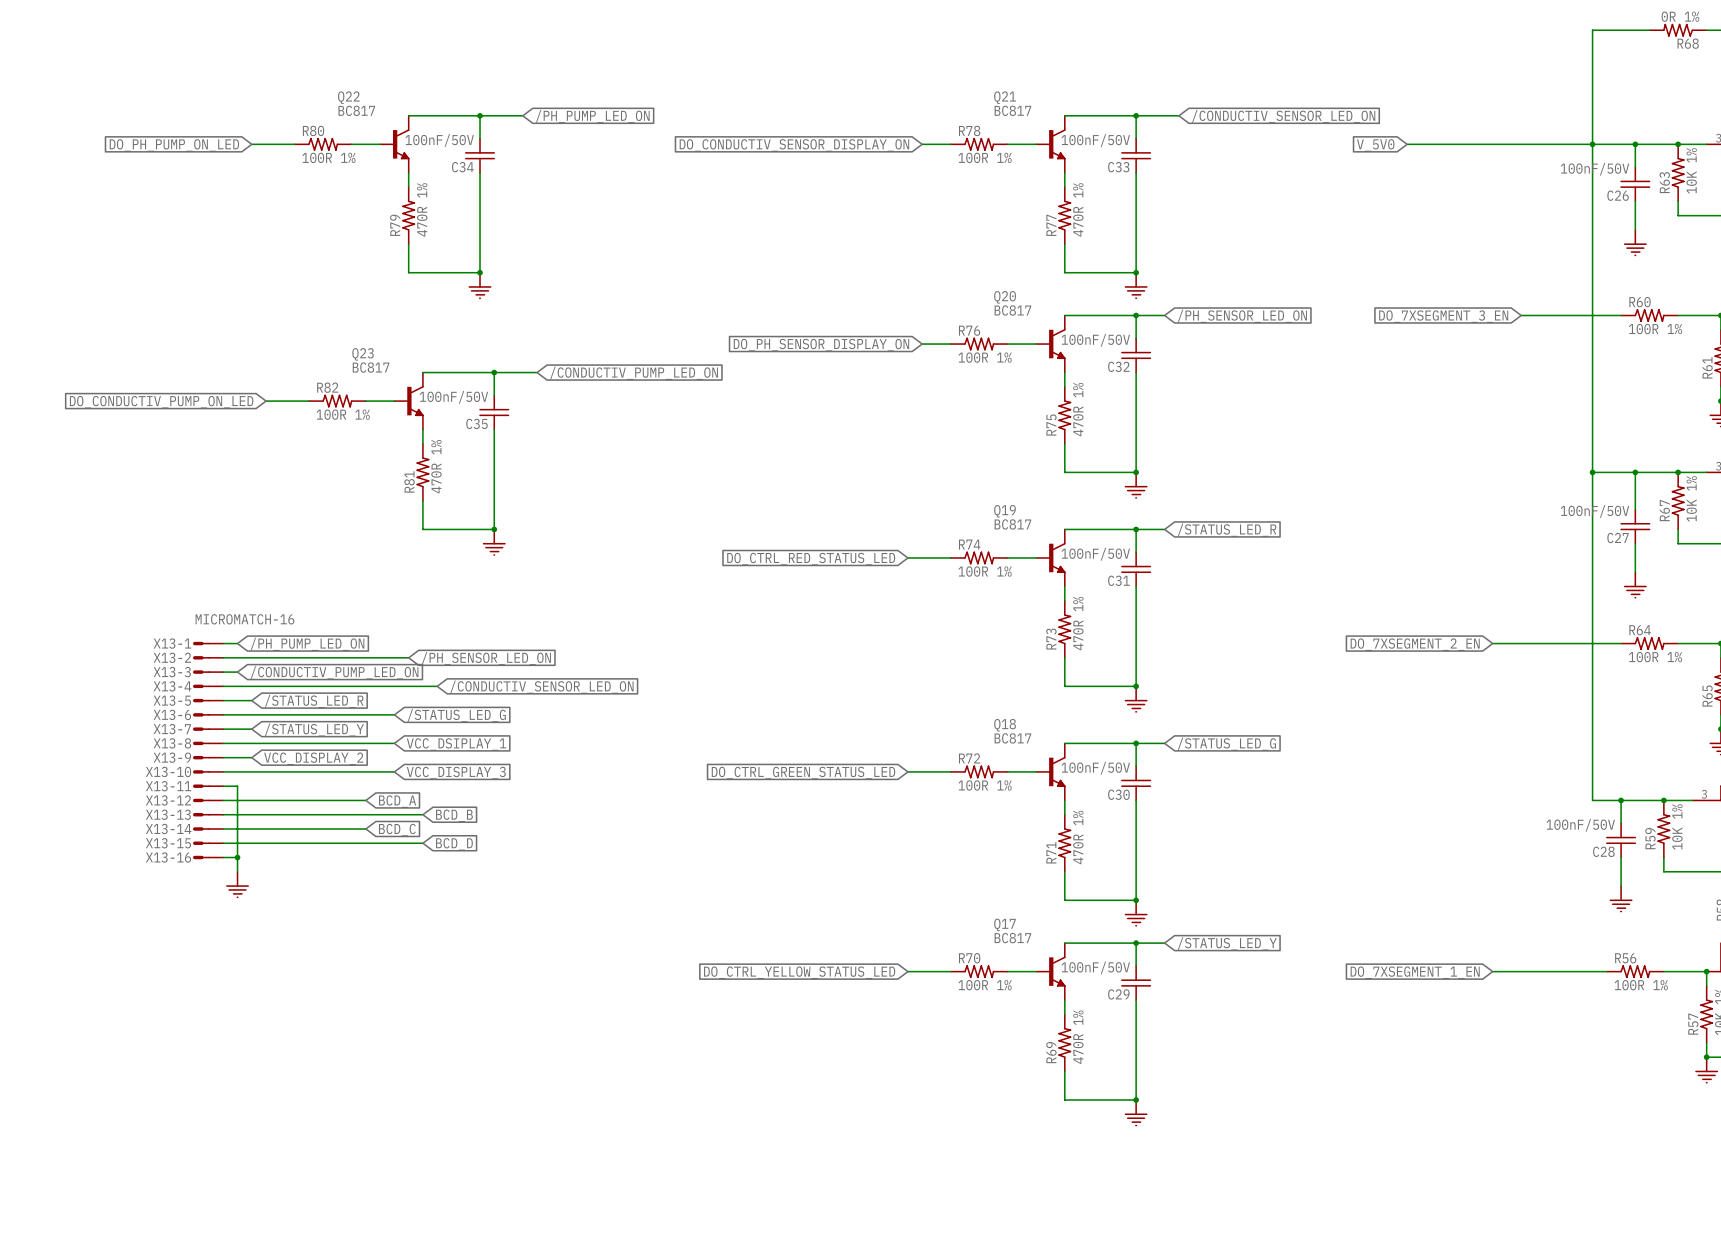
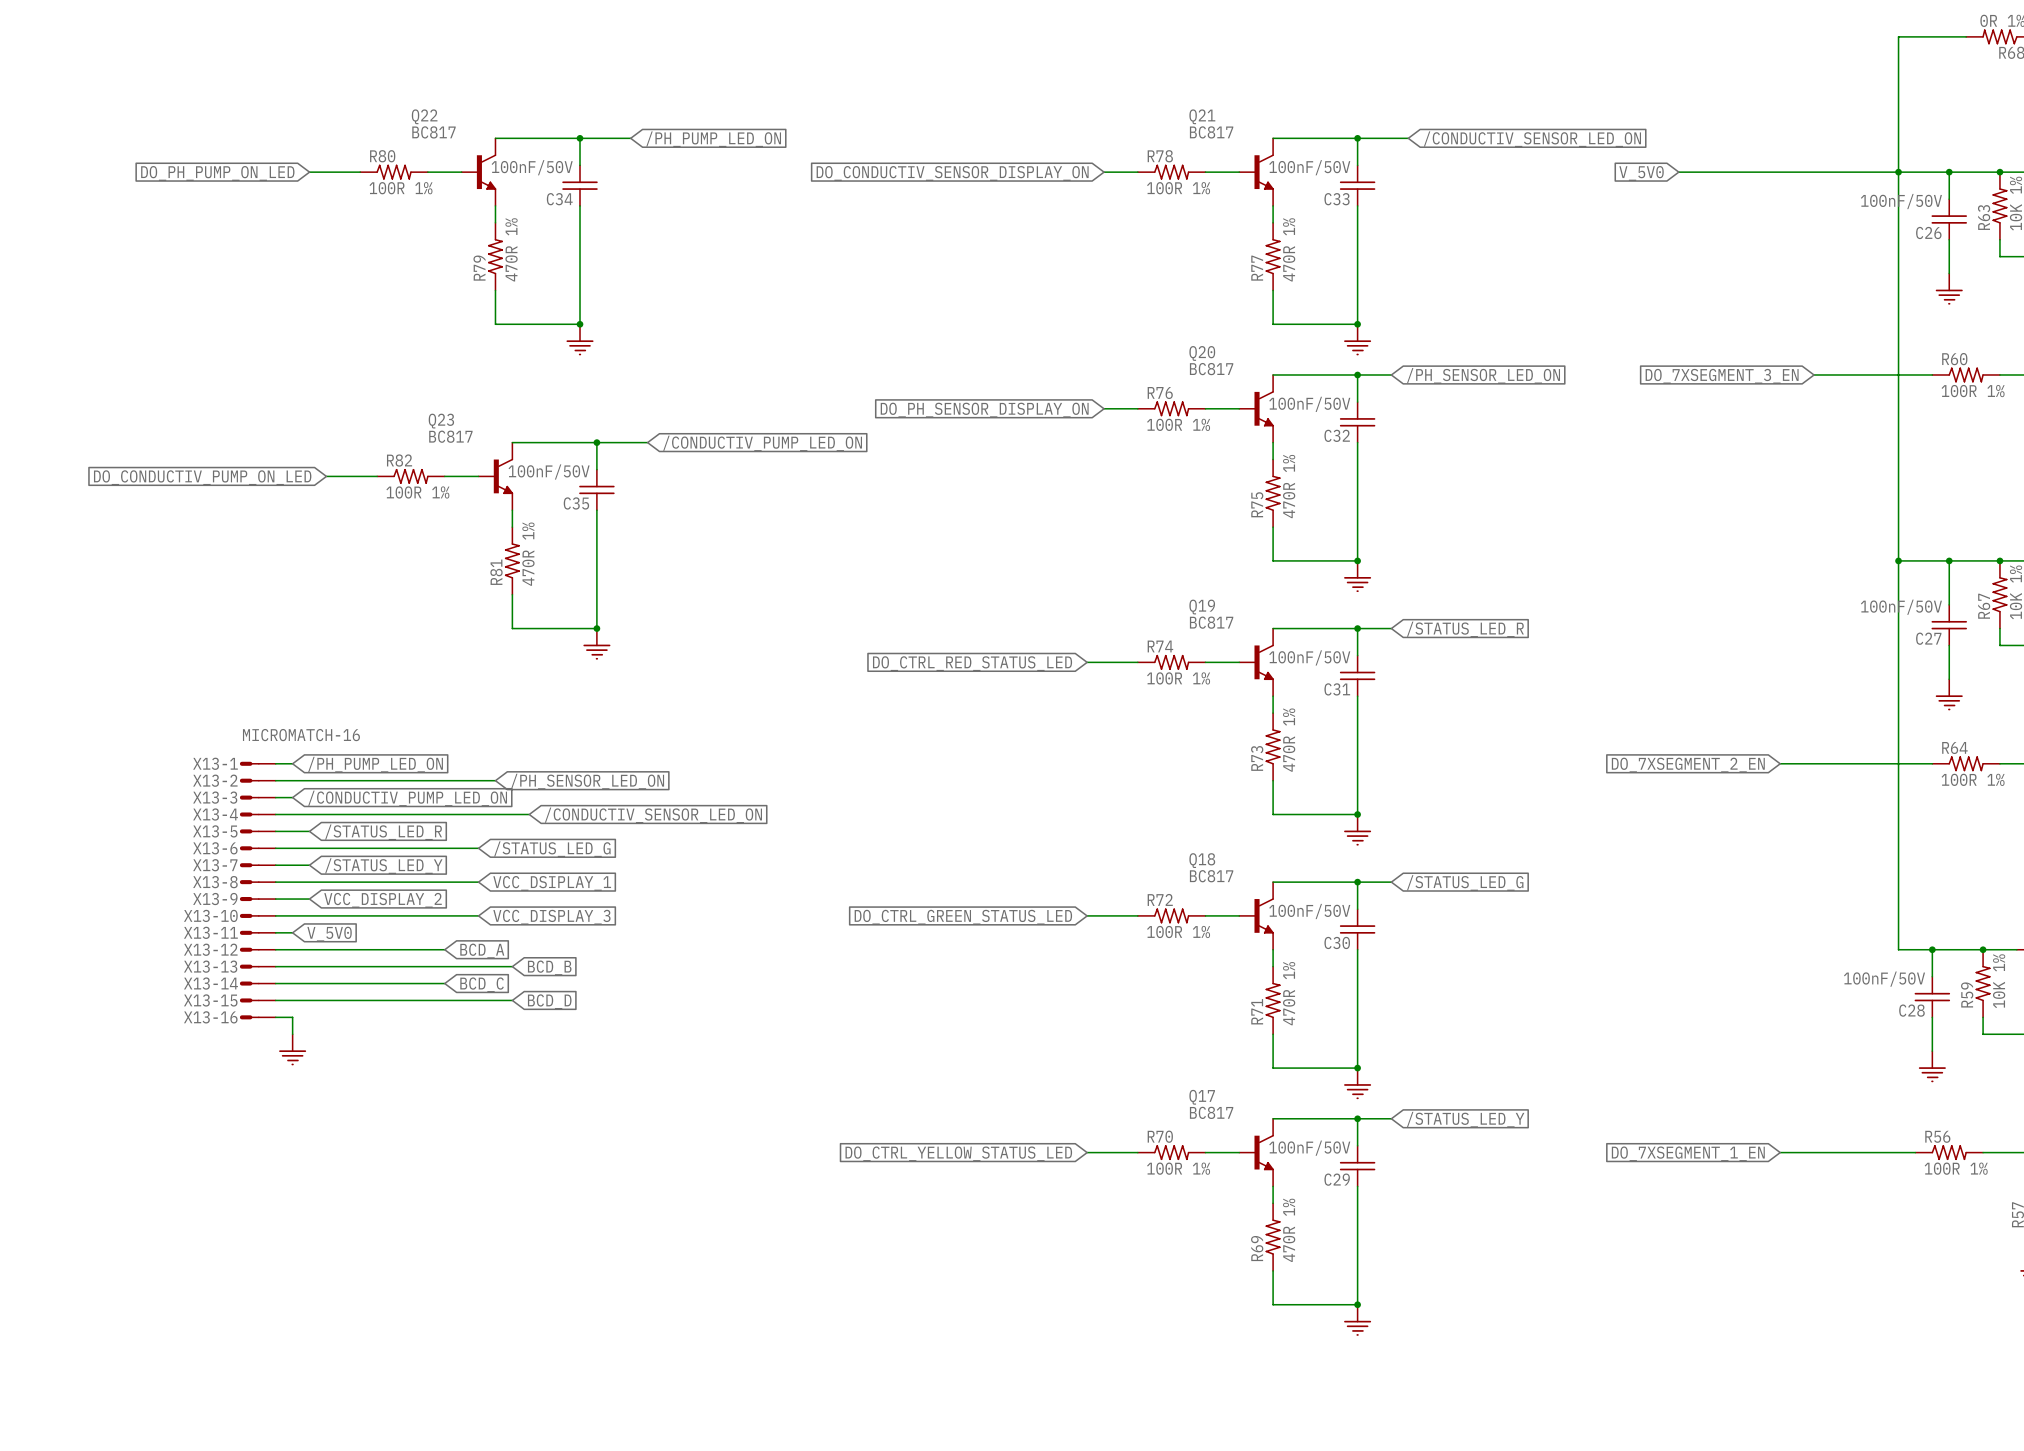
wire: (237, 786) (237, 857) -> none
global label: none -> V_5V0 (329, 934)
junction: (237, 857) -> none

